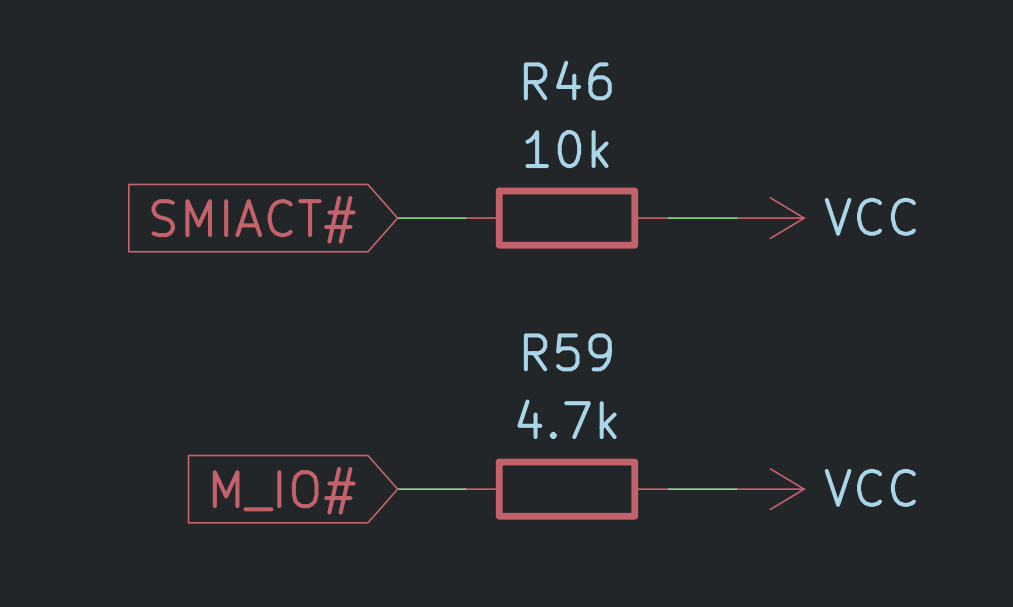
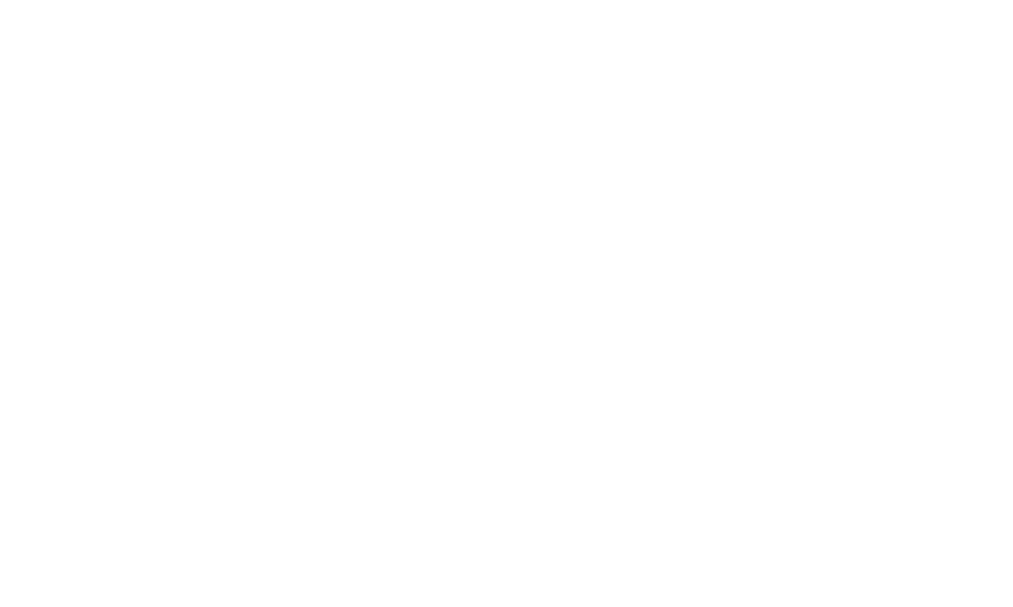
wire: (397, 218) (465, 218) -> none
R46: 10k (567, 218) -> none
wire: (668, 218) (736, 218) -> none
power symbol: VCC (770, 218) -> none
global label: SMIACT# (253, 219) -> none
wire: (397, 489) (465, 489) -> none
R59: 4.7k (567, 489) -> none
wire: (668, 489) (736, 489) -> none
power symbol: VCC (770, 489) -> none
global label: M_IO# (284, 490) -> none

